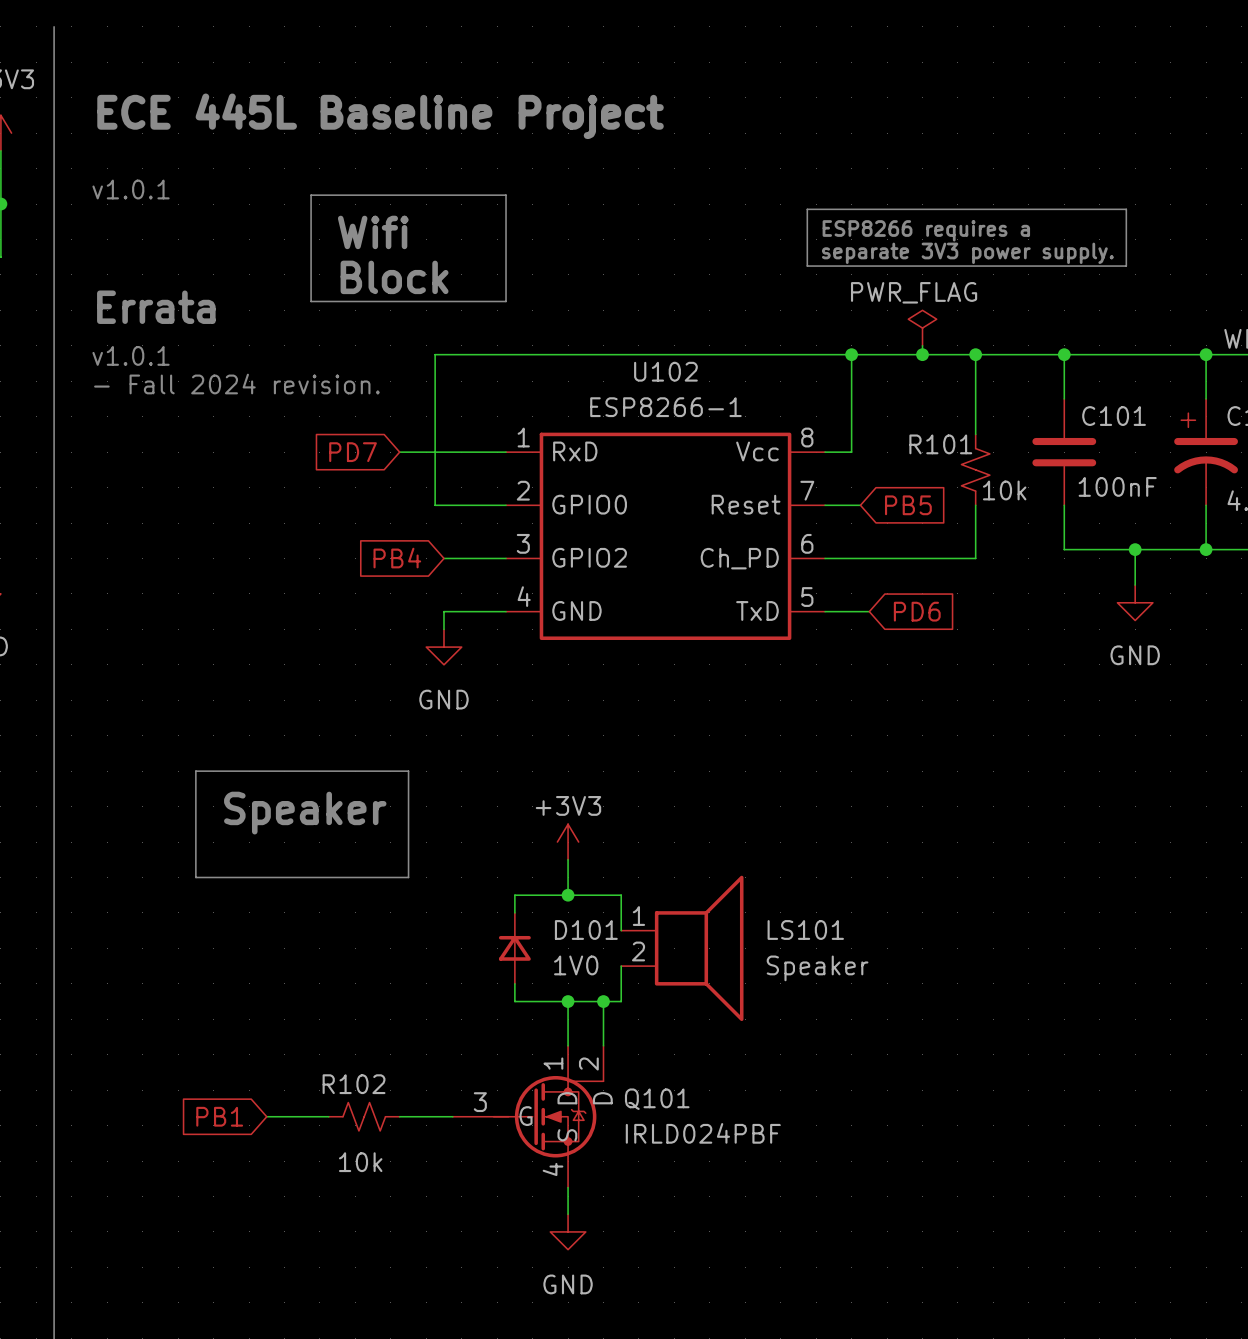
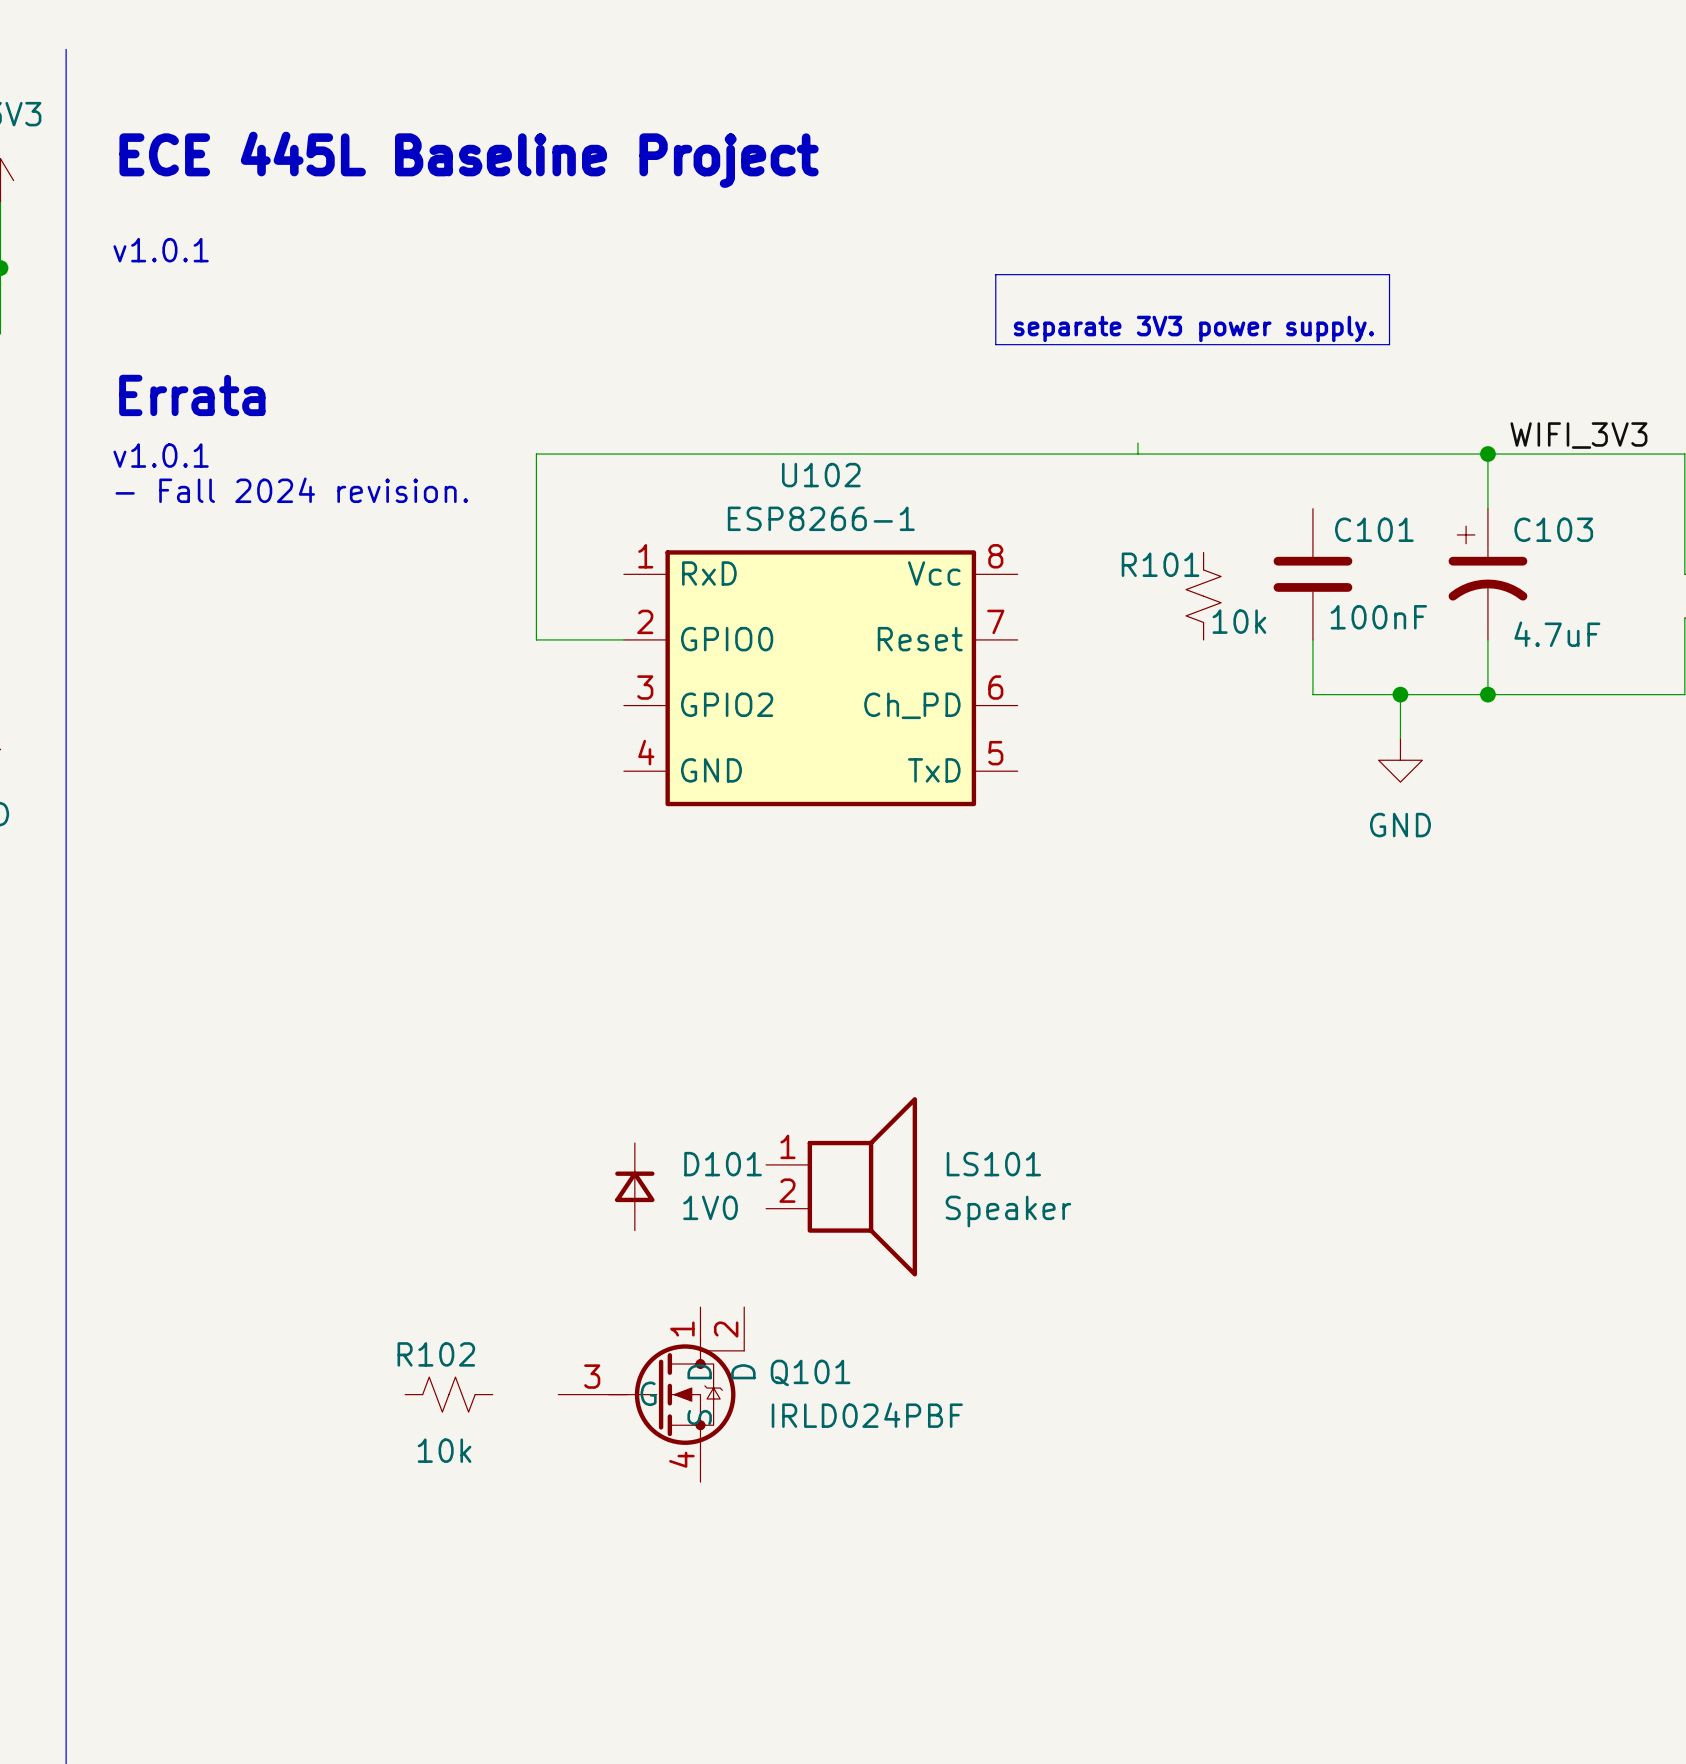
line: (311, 195) (506, 195) (506, 301) (311, 301) (311, 195) -> none
text: ESP8266 requires a (926, 230) -> none
text: Wifi (373, 232) -> none
text: Block (394, 277) -> none
power symbol: PWR_FLAG (922, 328) -> none
wire: (851, 354) (851, 452) (825, 452) -> none
junction: (851, 354) -> none
junction: (922, 354) -> none
wire: (975, 354) (975, 434) -> none
junction: (975, 354) -> none
wire: (1064, 354) (1064, 398) -> none
junction: (1064, 354) -> none
global label: PD7 (353, 452) -> none
wire: (399, 452) (506, 452) -> none
wire: (825, 505) (860, 505) -> none
global label: PB5 (908, 505) -> none
wire: (975, 505) (975, 558) (825, 558) -> none
global label: PB4 (397, 558) -> none
wire: (443, 558) (506, 558) -> none
wire: (506, 611) (443, 611) (443, 629) -> none
wire: (825, 611) (869, 611) -> none
global label: PD6 (917, 611) -> none
power symbol: GND (443, 647) -> none
line: (195, 771) (408, 771) (408, 877) (195, 877) (195, 771) -> none
text: Speaker (305, 813) -> none
power symbol: +3V3 (568, 842) -> none
wire: (568, 859) (568, 895) -> none
junction: (568, 895) -> none
wire: (514, 912) (514, 895) (621, 895) (621, 930) -> none
wire: (621, 966) (621, 1001) (514, 1001) (514, 983) -> none
wire: (568, 1001) (568, 1045) -> none
junction: (568, 1001) -> none
wire: (603, 1001) (603, 1045) -> none
junction: (603, 1001) -> none
global label: PB1 (219, 1116) -> none
wire: (266, 1116) (328, 1116) -> none
wire: (399, 1116) (452, 1116) -> none
wire: (568, 1187) (568, 1214) -> none
power symbol: GND (568, 1231) -> none

